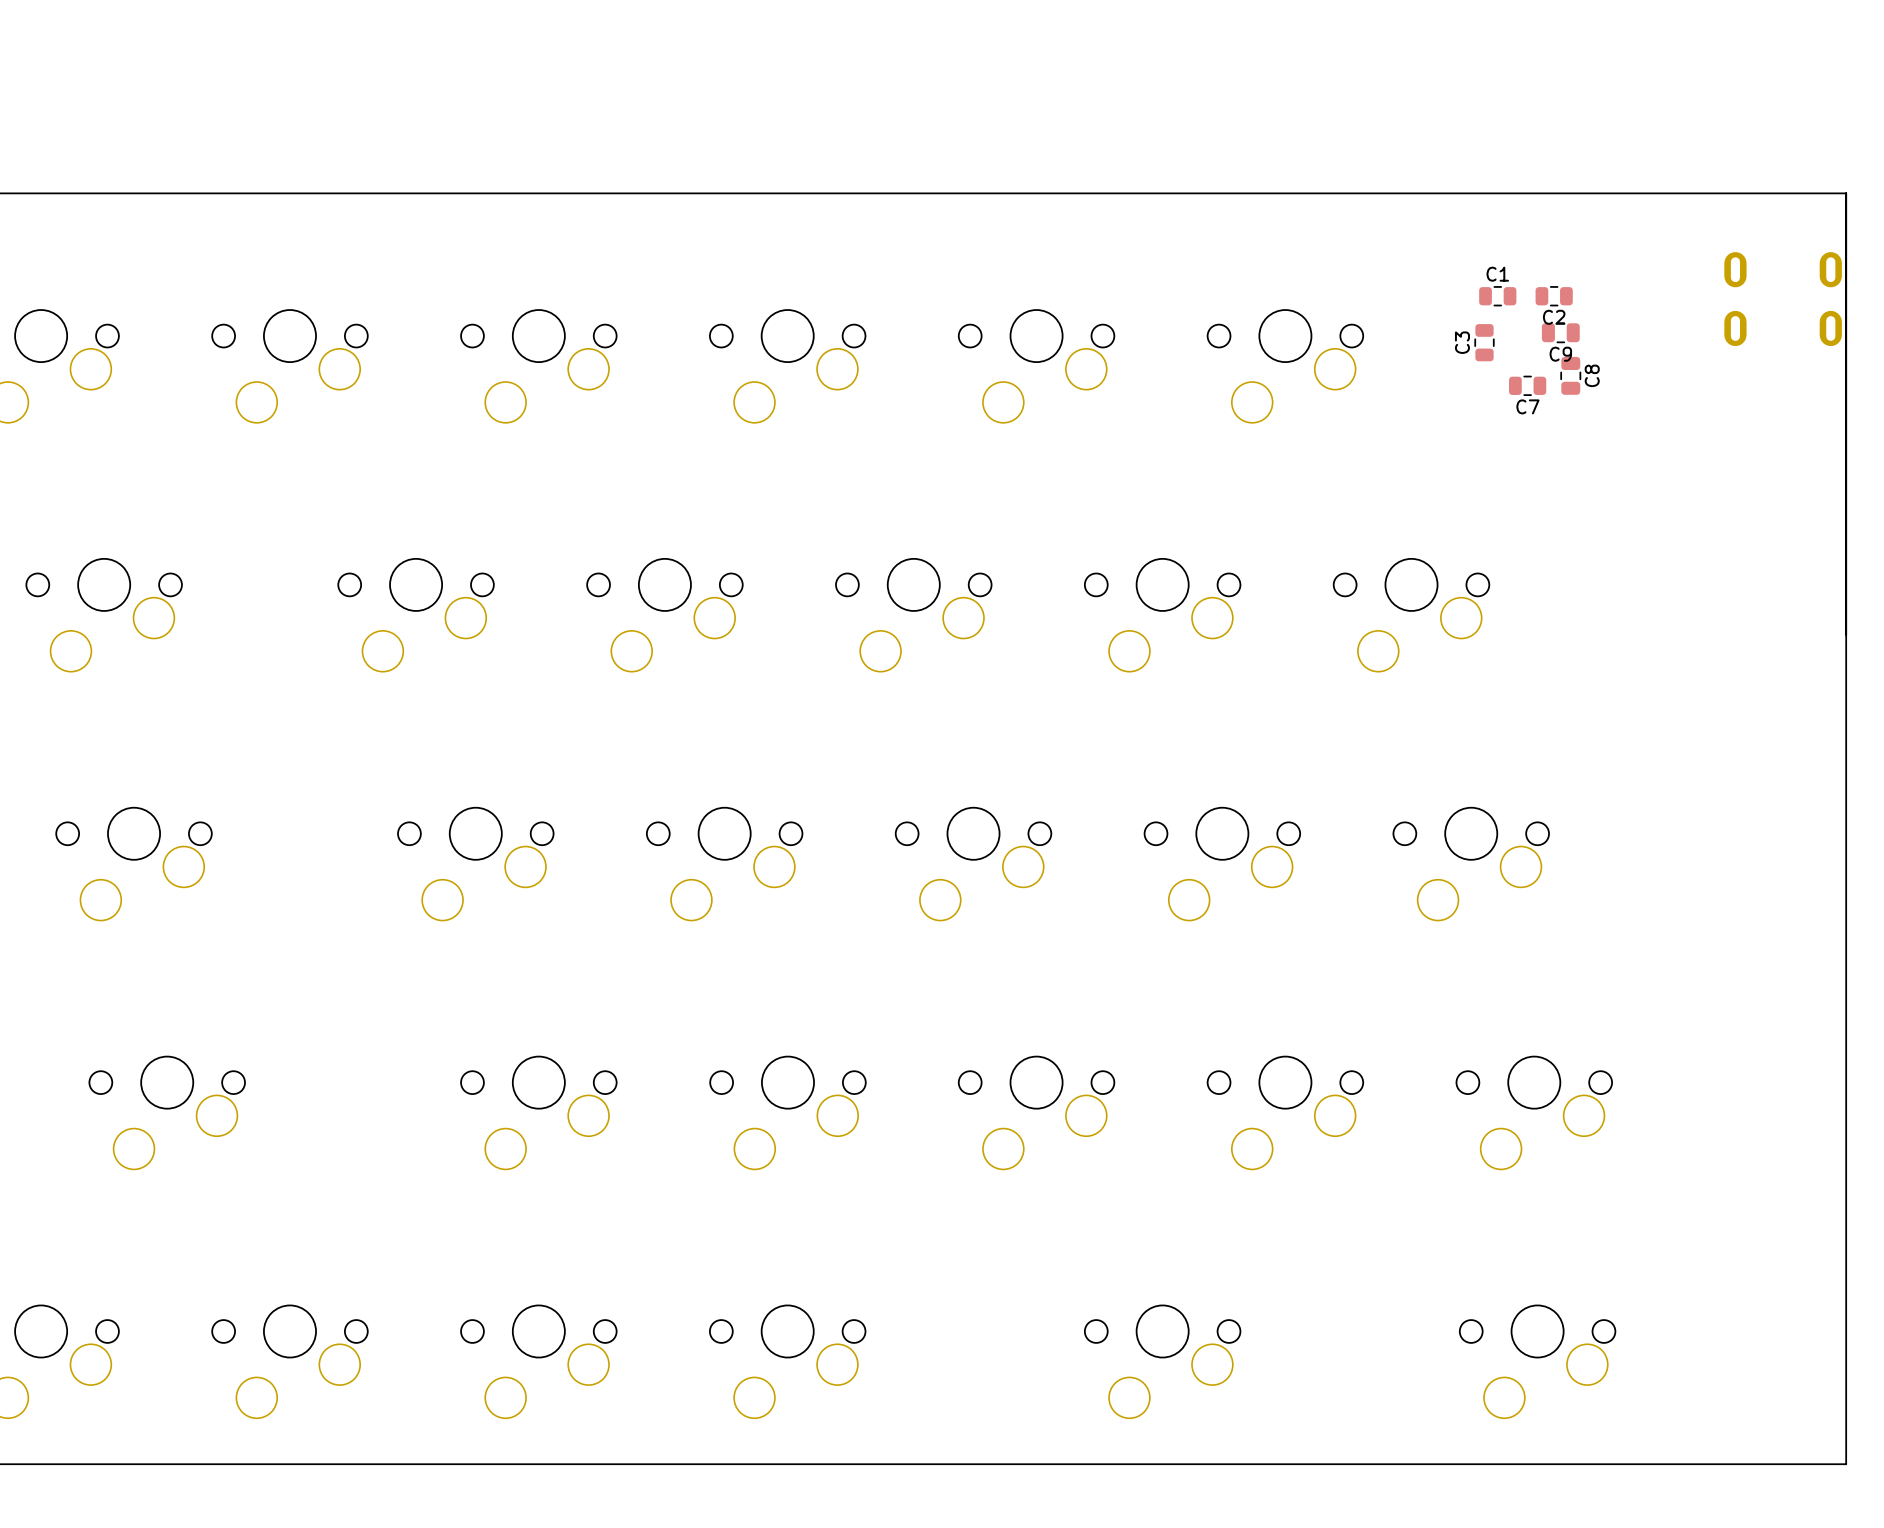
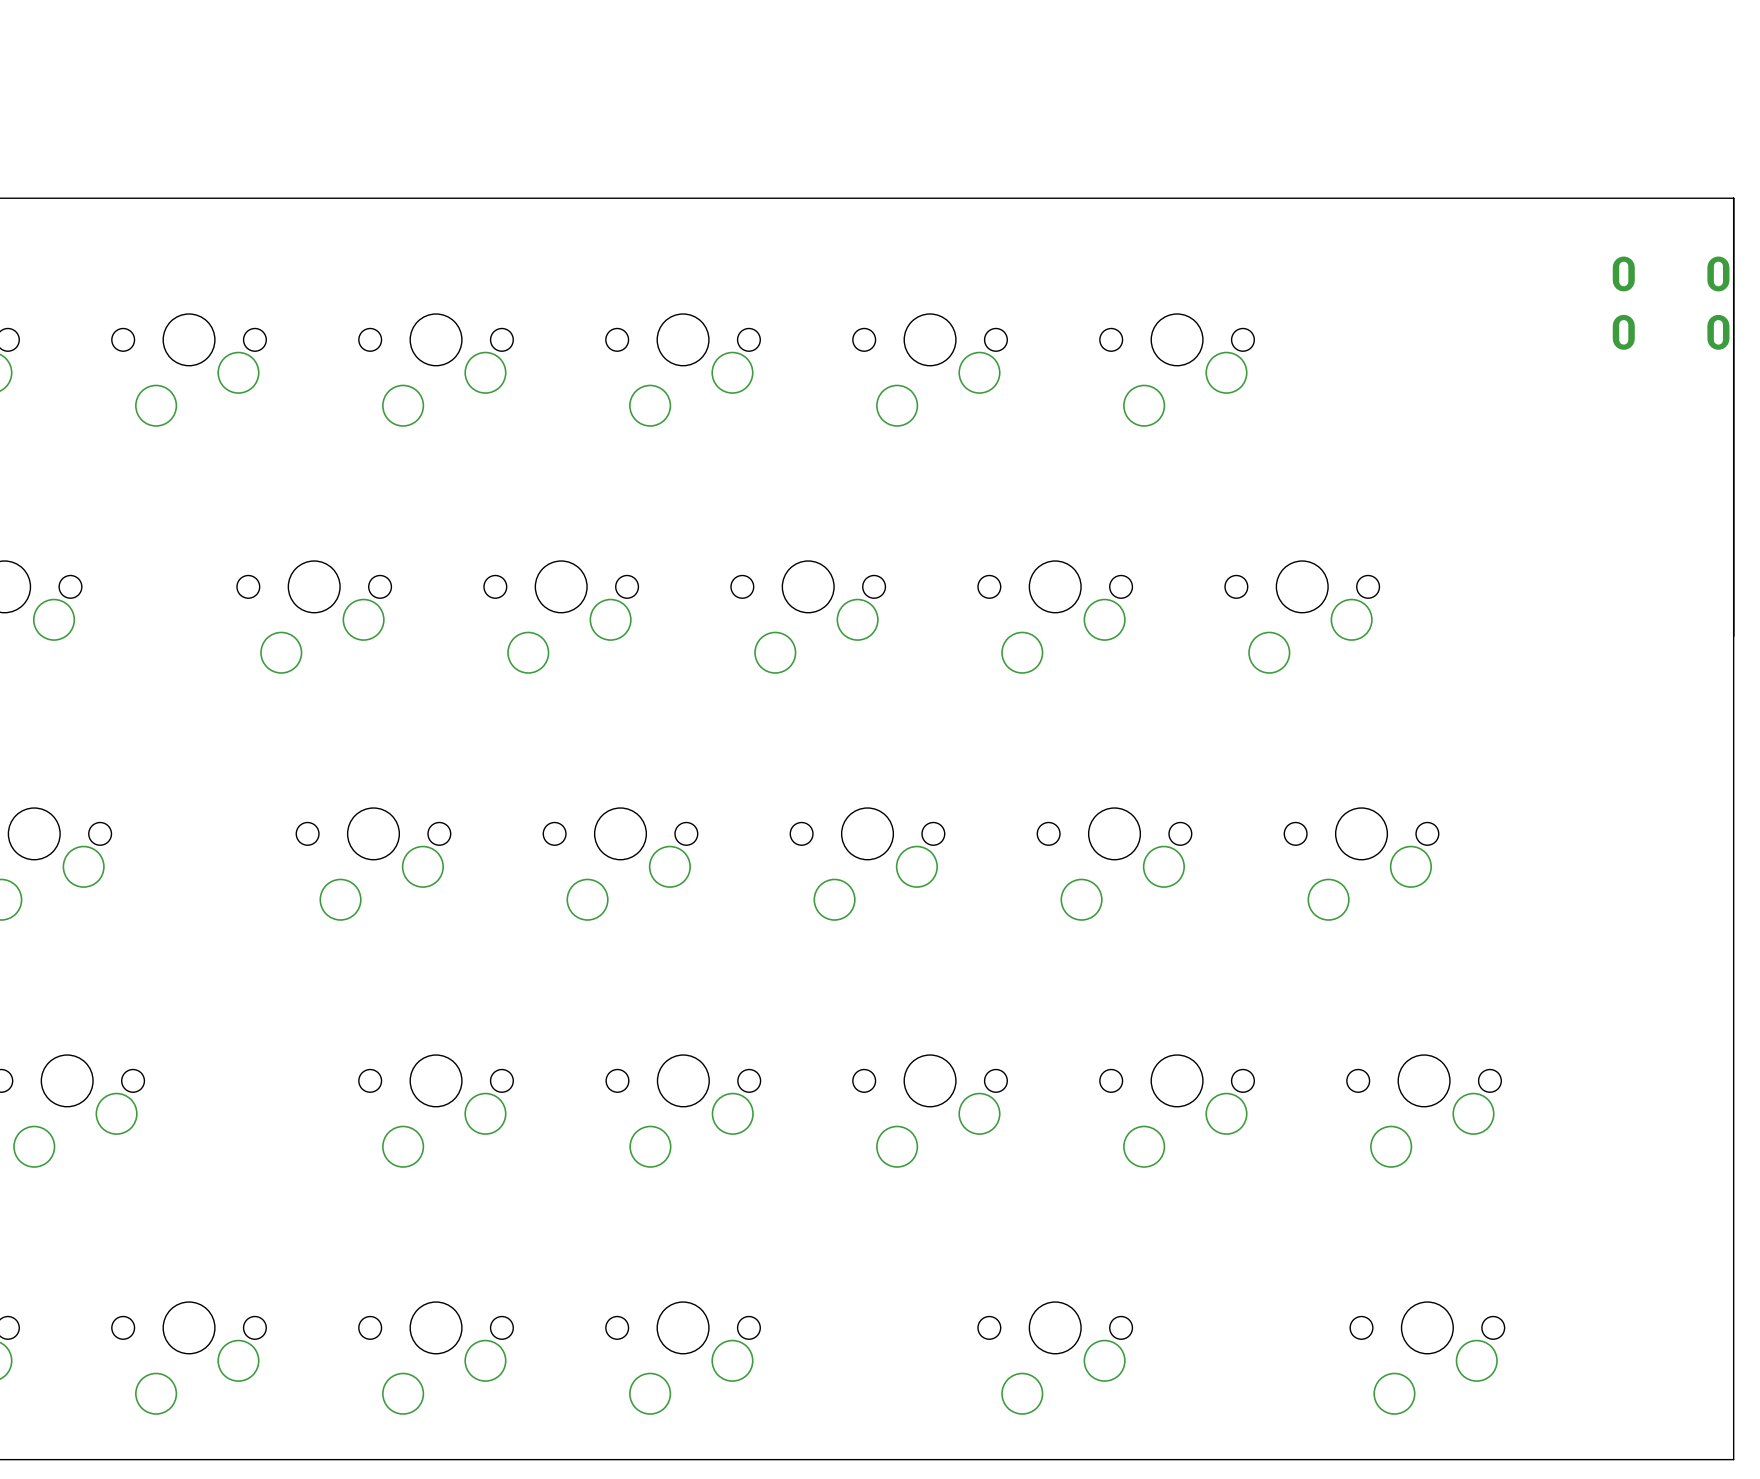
C1: (1497, 296) -> none
C2: (1554, 296) -> none
C9: (1560, 332) -> none
C3: (1484, 342) -> none
C8: (1570, 375) -> none
C7: (1527, 385) -> none

